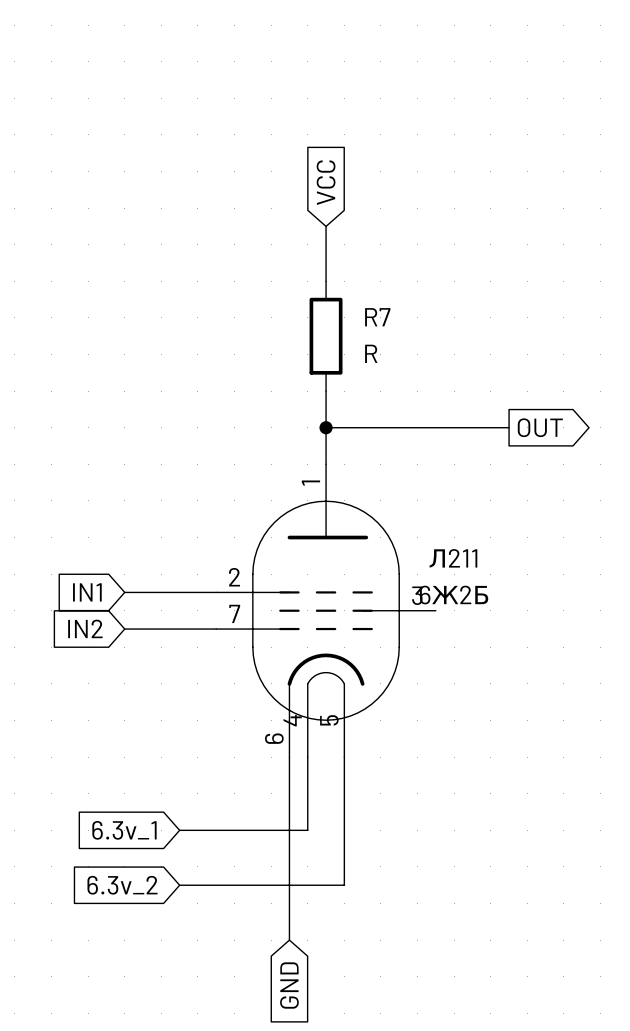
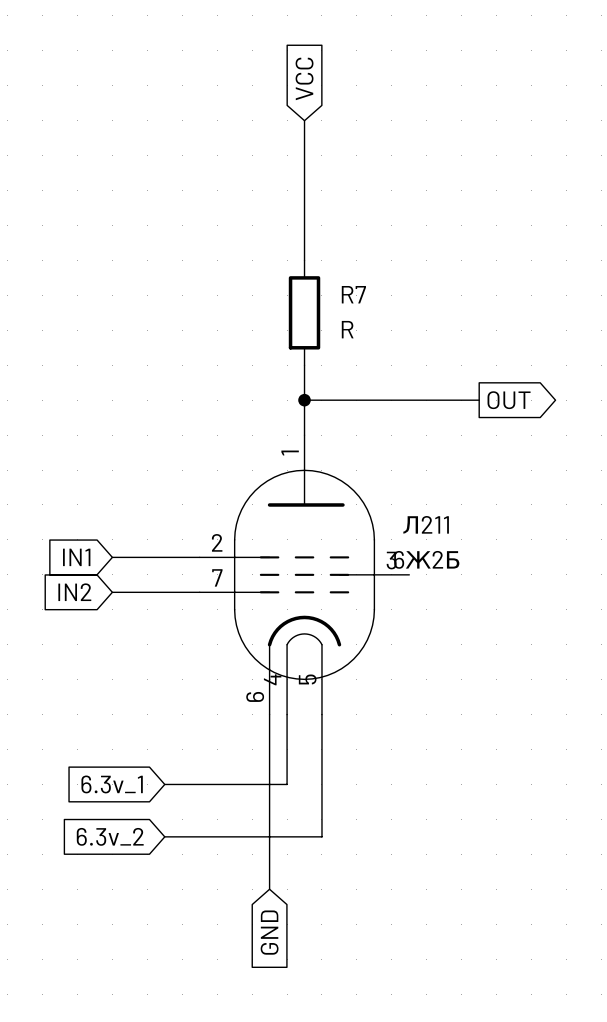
wire: none -> (304, 120) (304, 208)
global label position: VCC (326, 182) -> VCC (304, 78)

